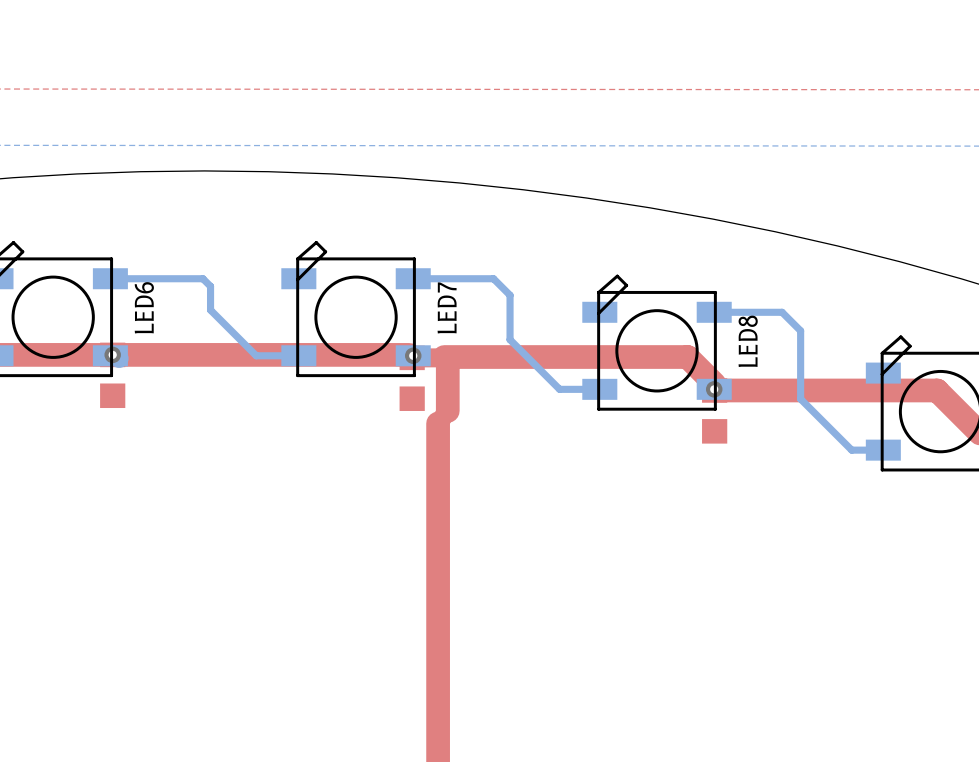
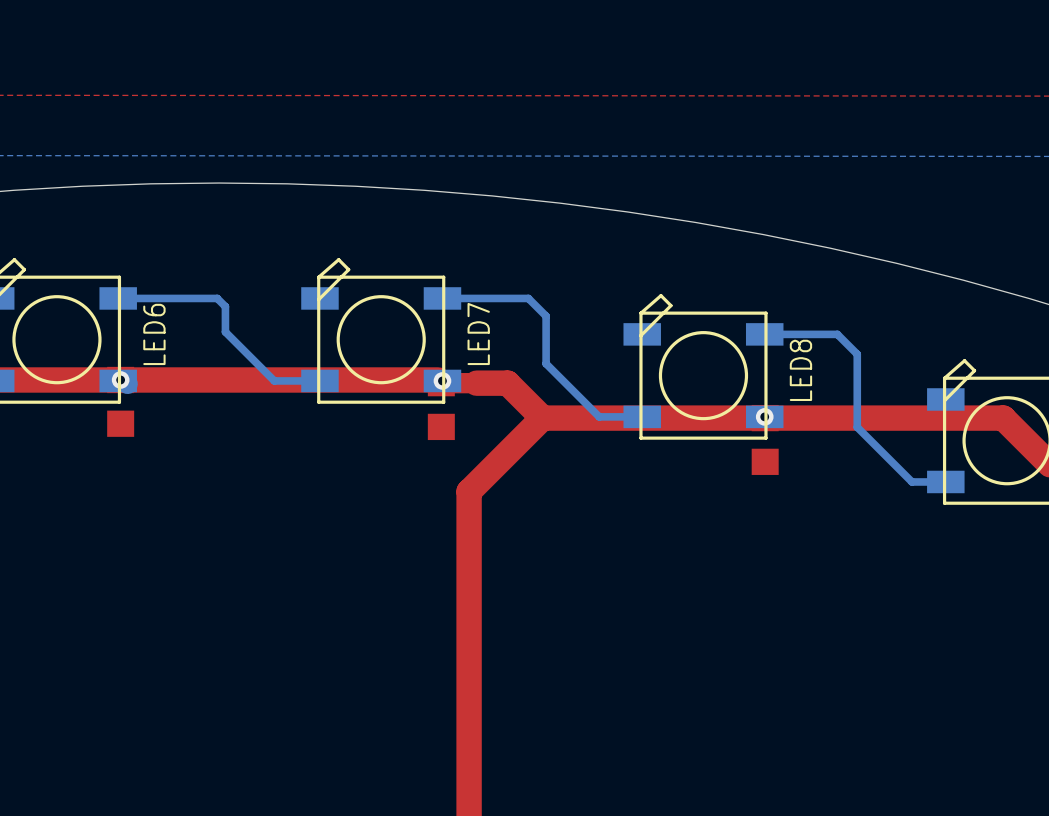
top track: none -> (476, 383) (507, 383) (542, 418)
top track: none -> (542, 418) (469, 491)
top track: (714, 390) (714, 384) (687, 357) (444, 357) (447, 360) (447, 410) (438, 423) (438, 459) -> (765, 418) (542, 418)

